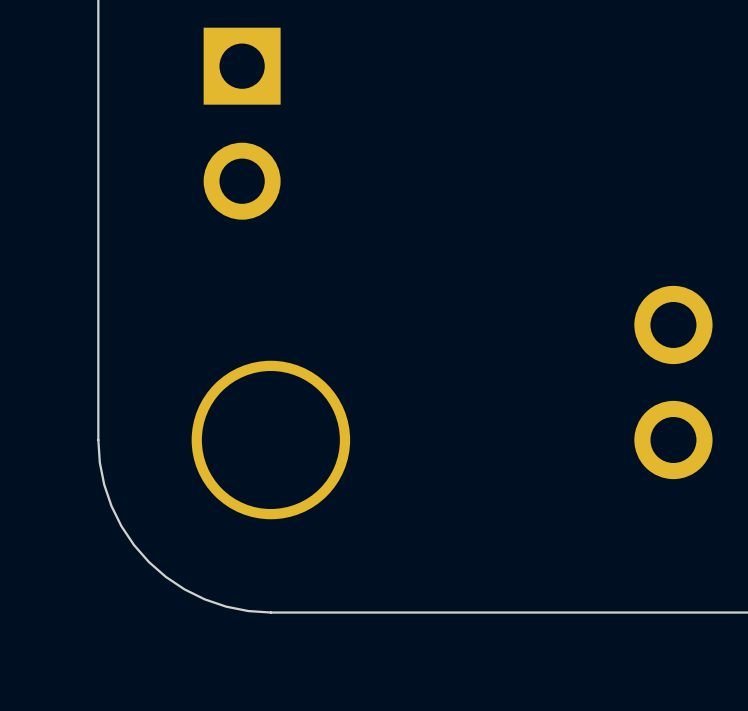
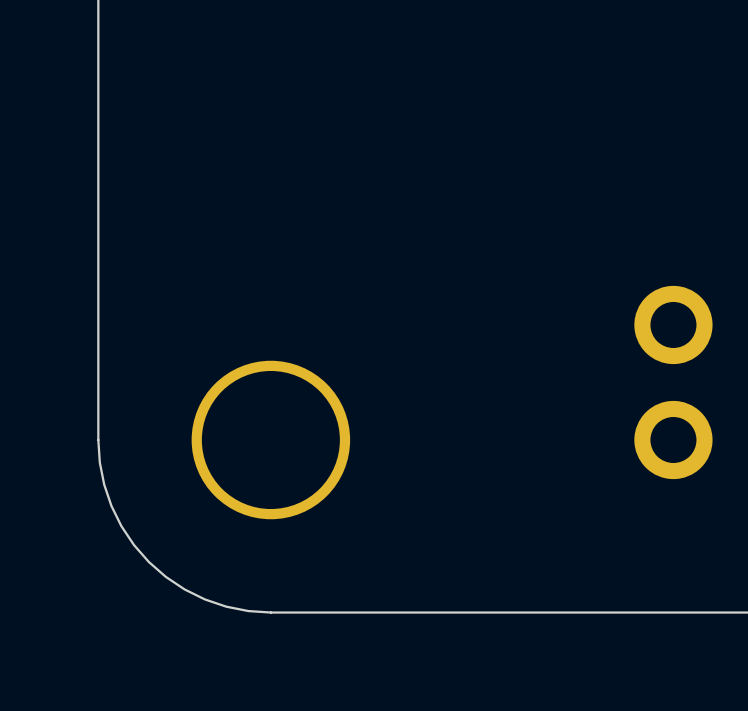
part: (242, 123) -> none

